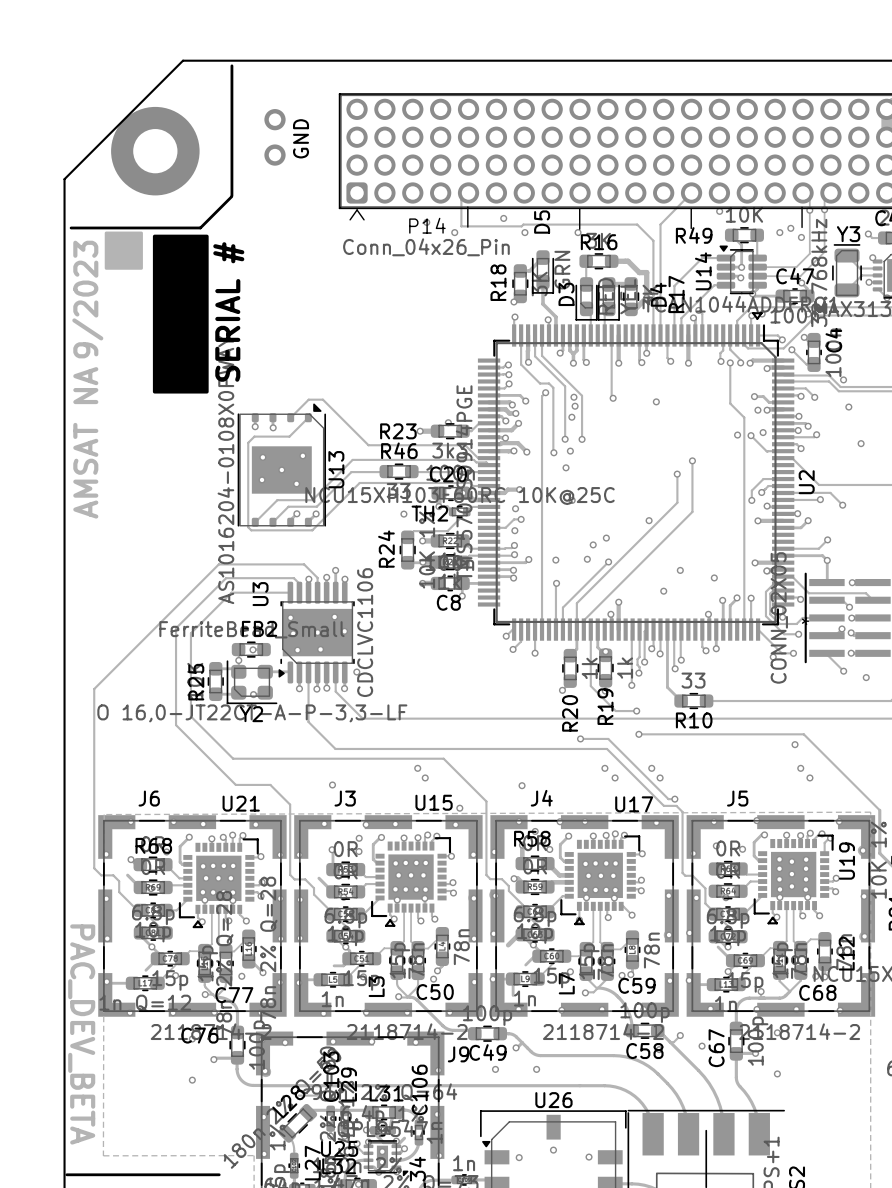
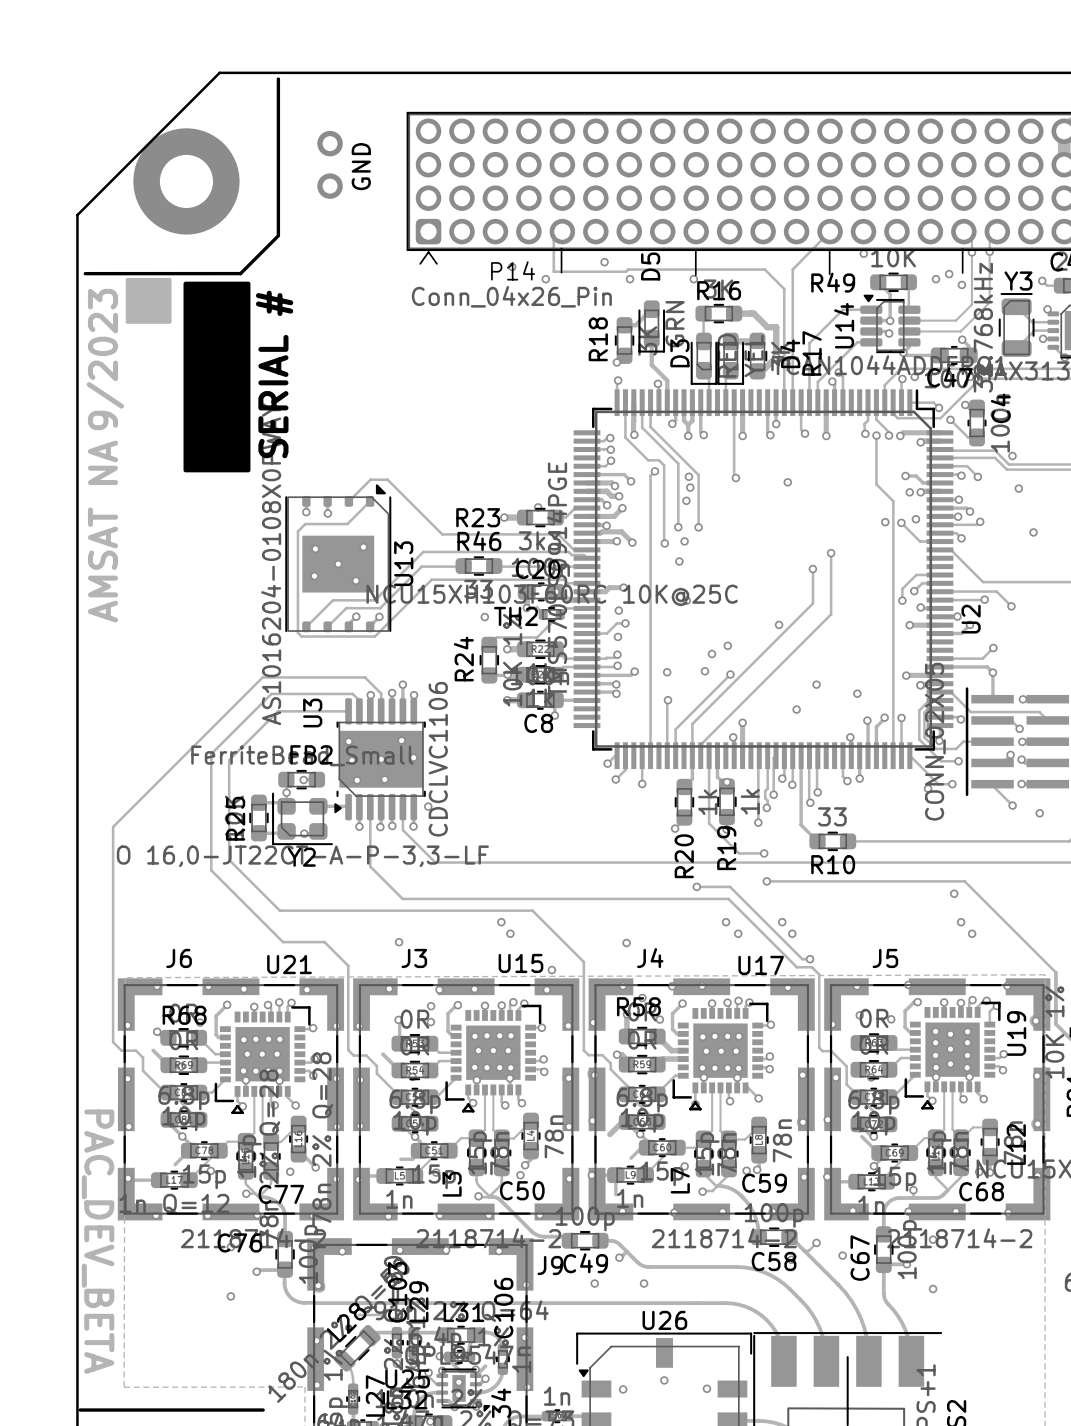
C47 name position: C47 (795, 276) -> C47 (949, 377)
U2 footprint: [477, 312, 795, 641] -> [573, 389, 954, 770]

